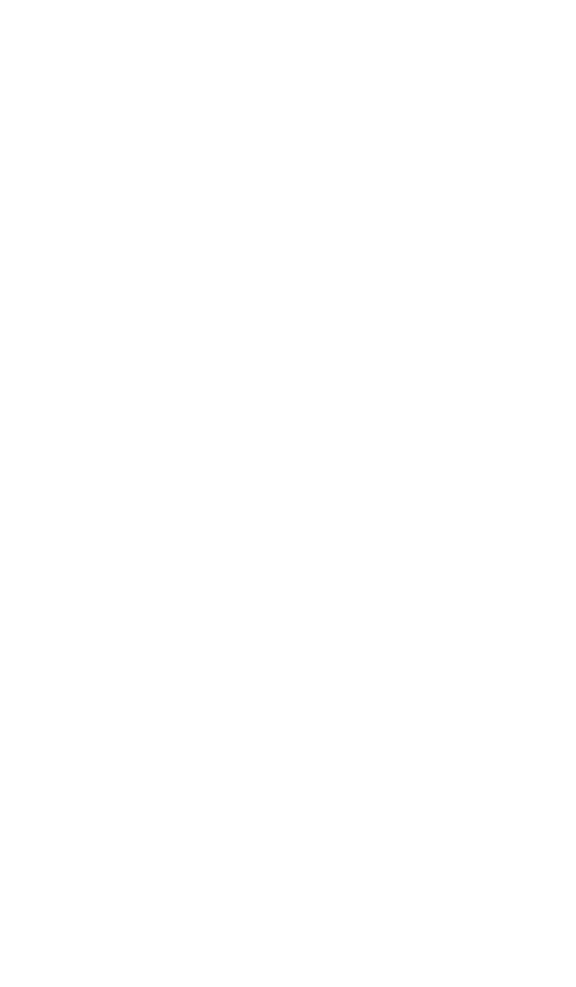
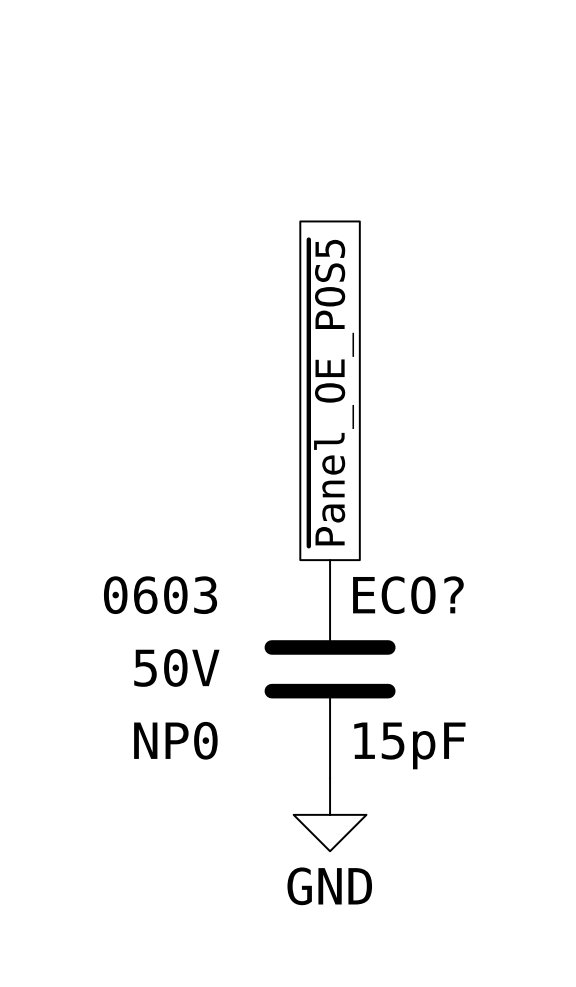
global label: none -> ~{Panel_OE_POS5} (331, 392)
ECO?: none -> 15pF (330, 669)
power symbol: none -> GND (330, 814)

